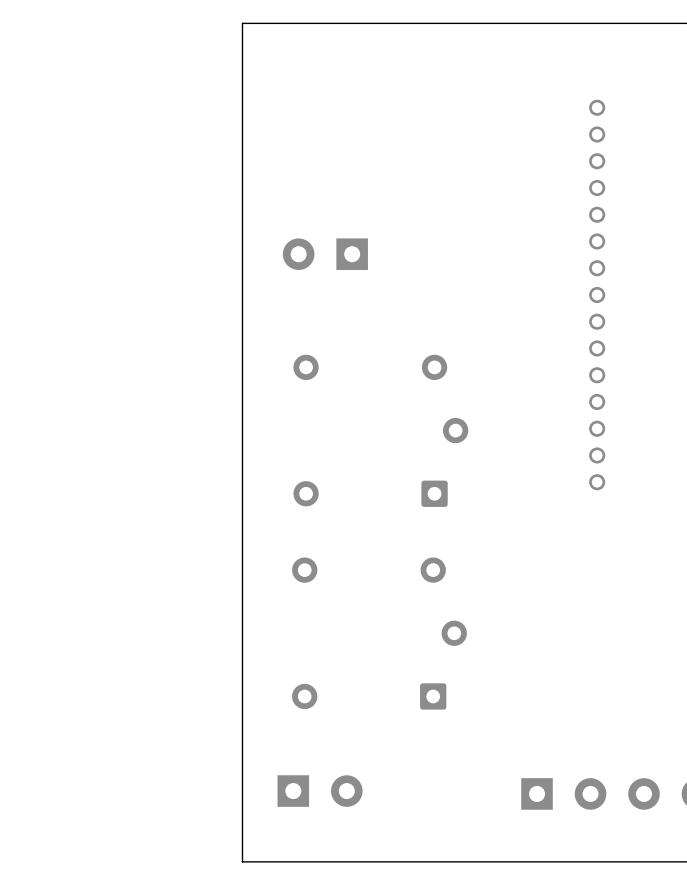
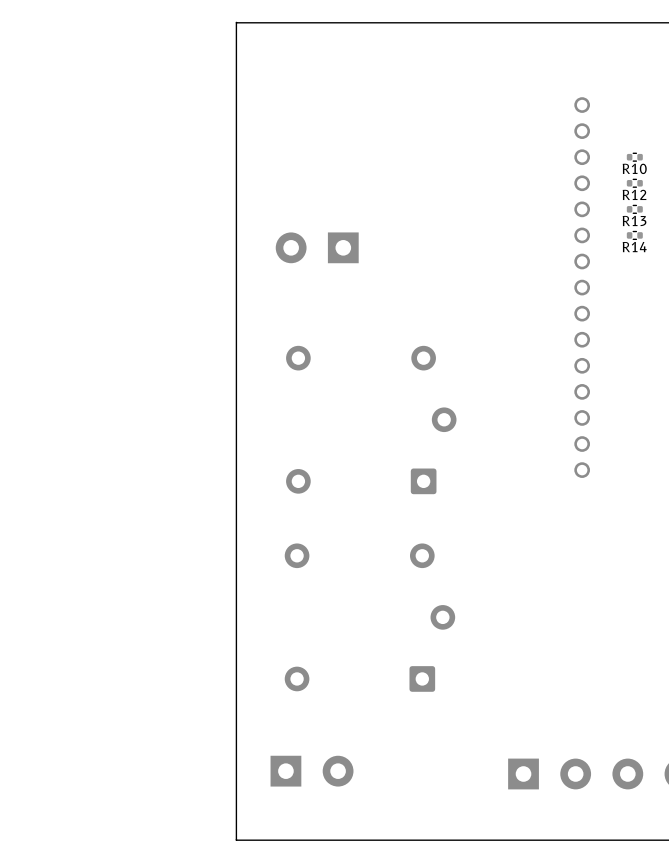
R10: none -> (634, 157)
R12: none -> (634, 183)
R13: none -> (634, 209)
R14: none -> (634, 235)

